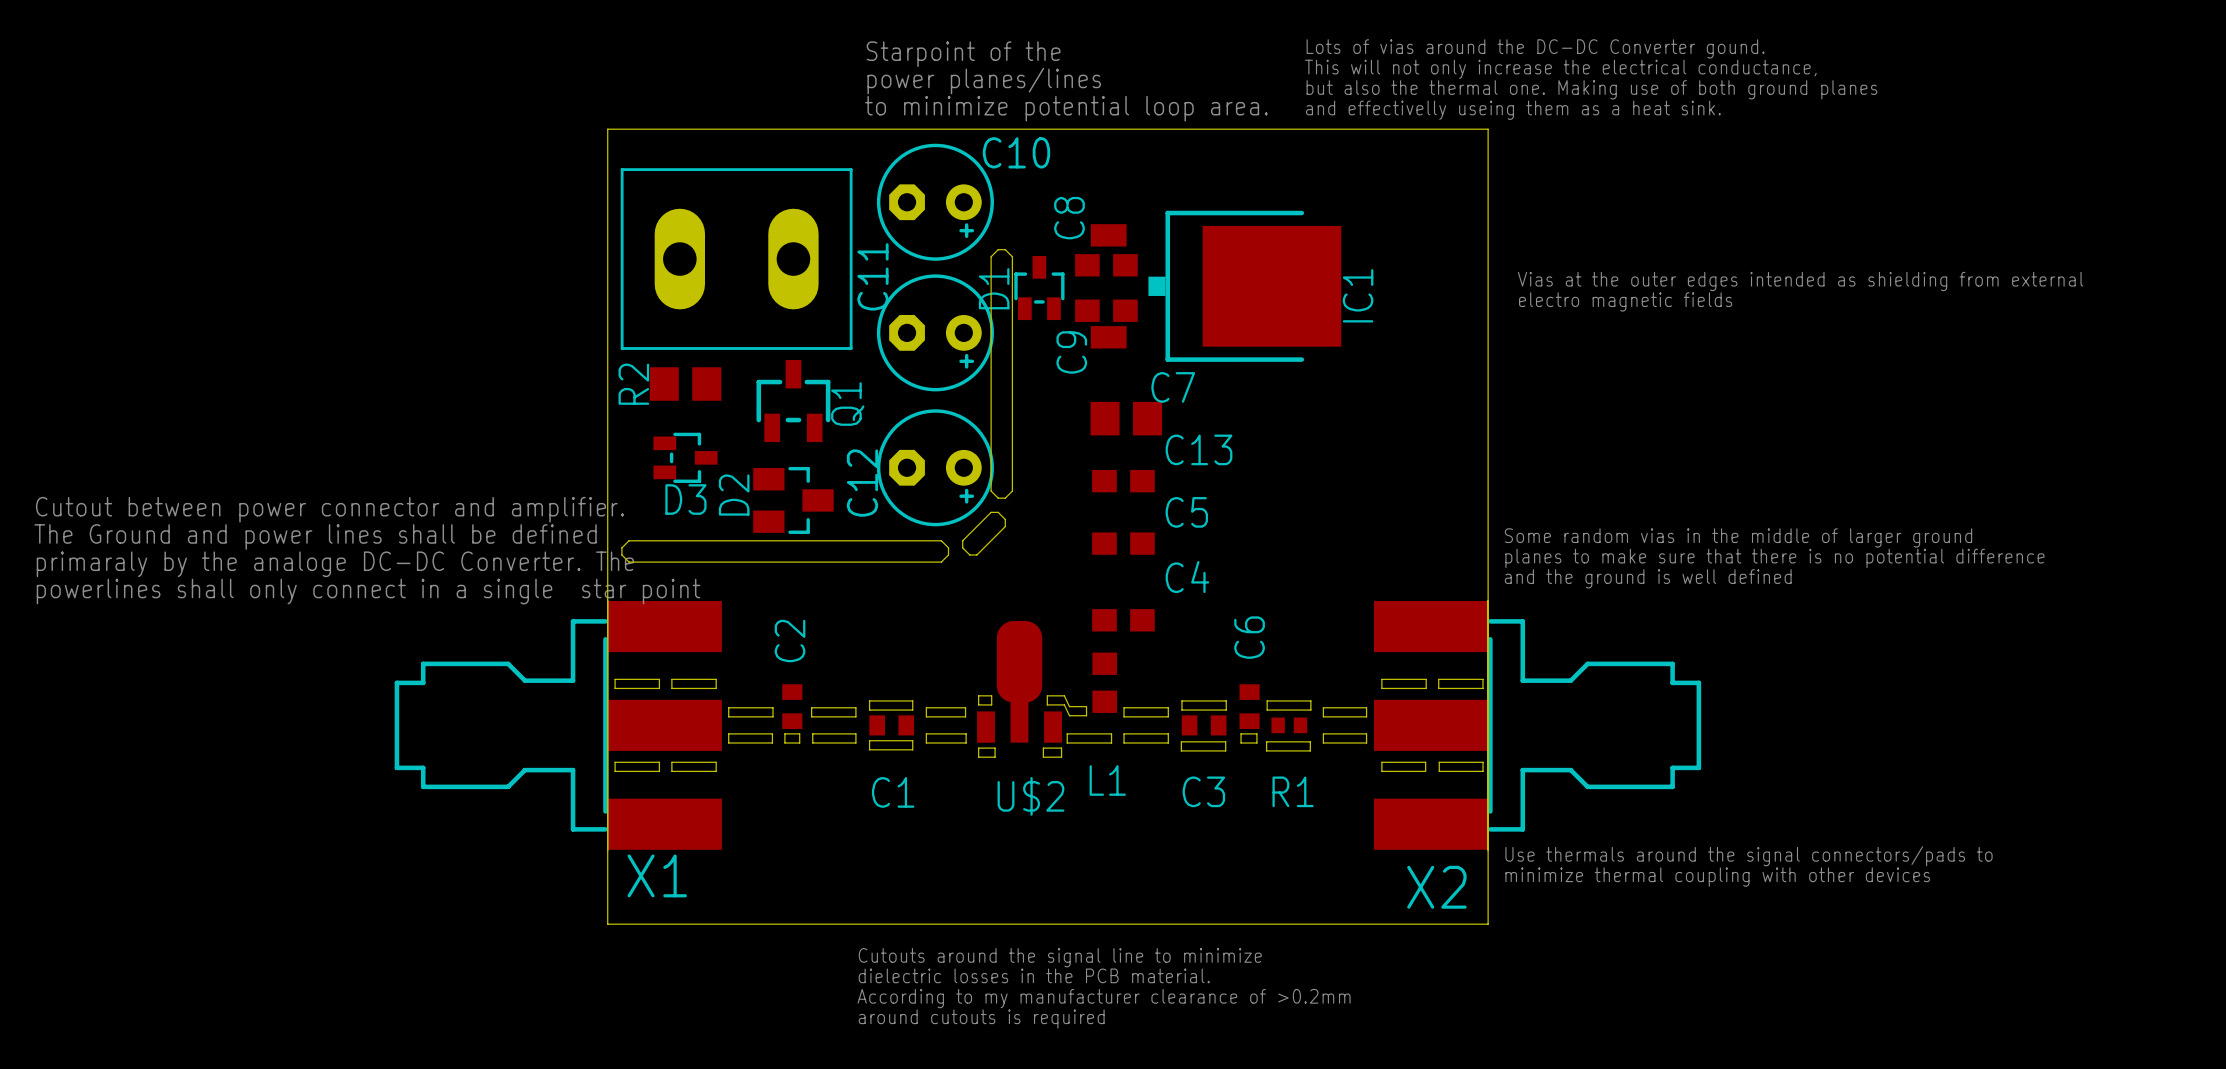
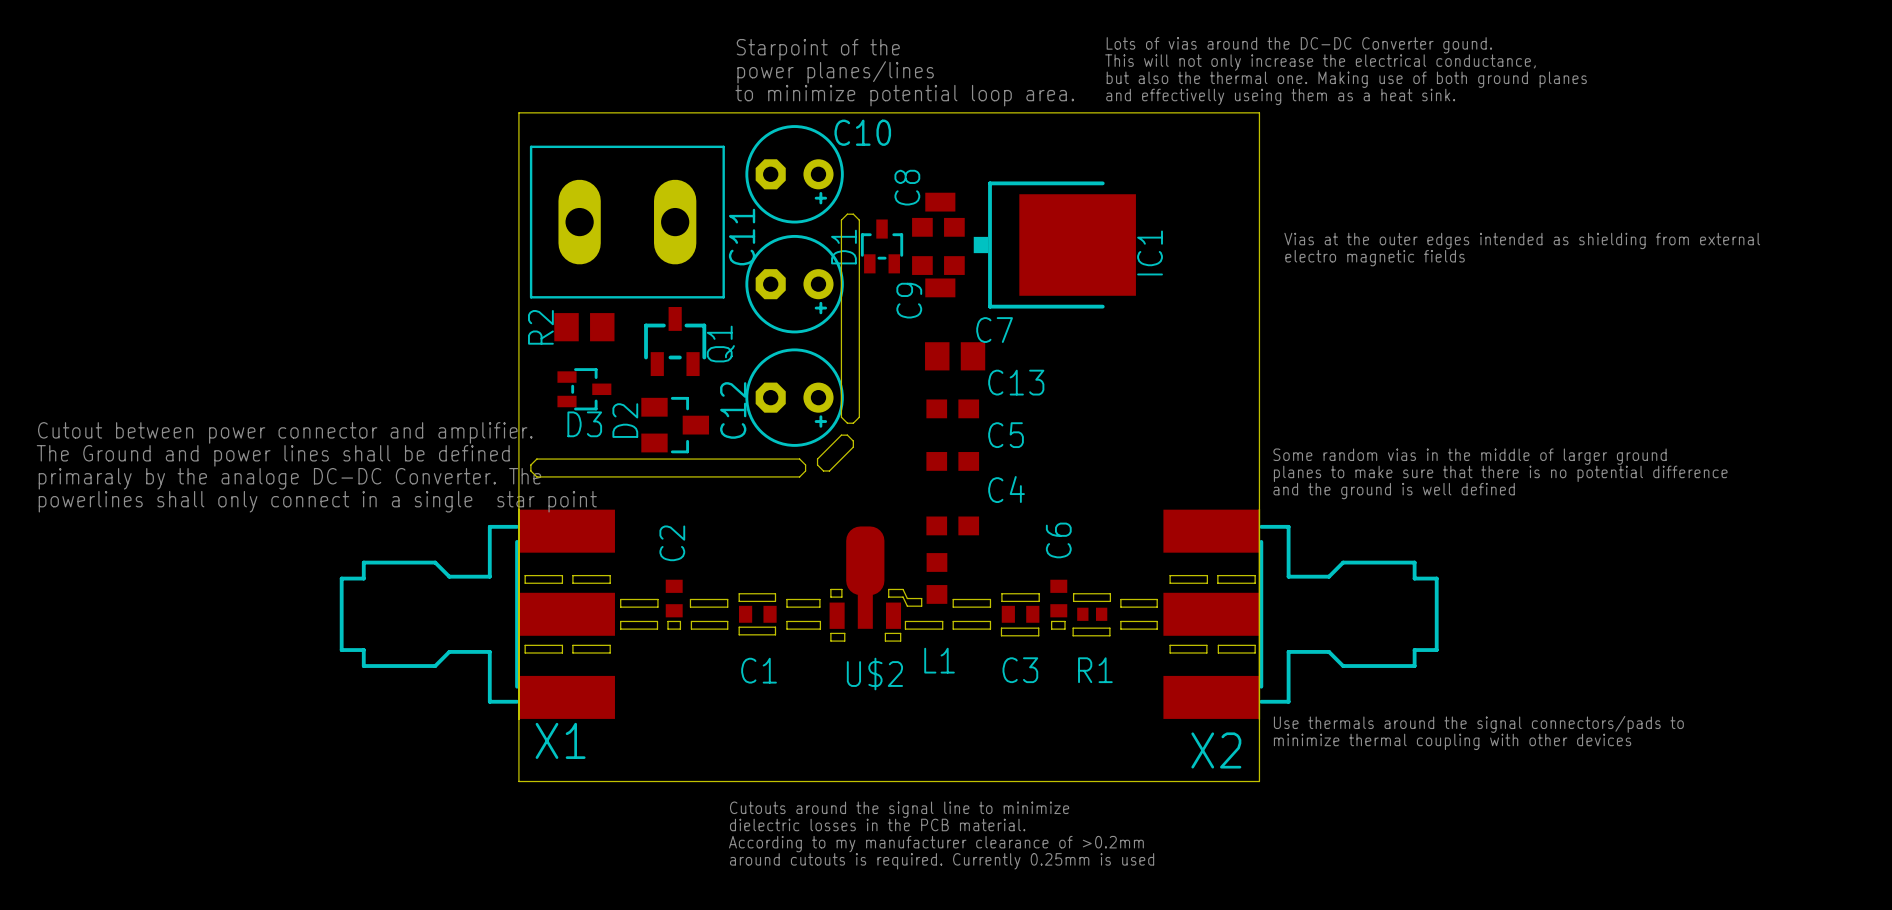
text: around cutouts is required (981, 1019) -> around cutouts is required. Currently 0.25mm is used (942, 861)

